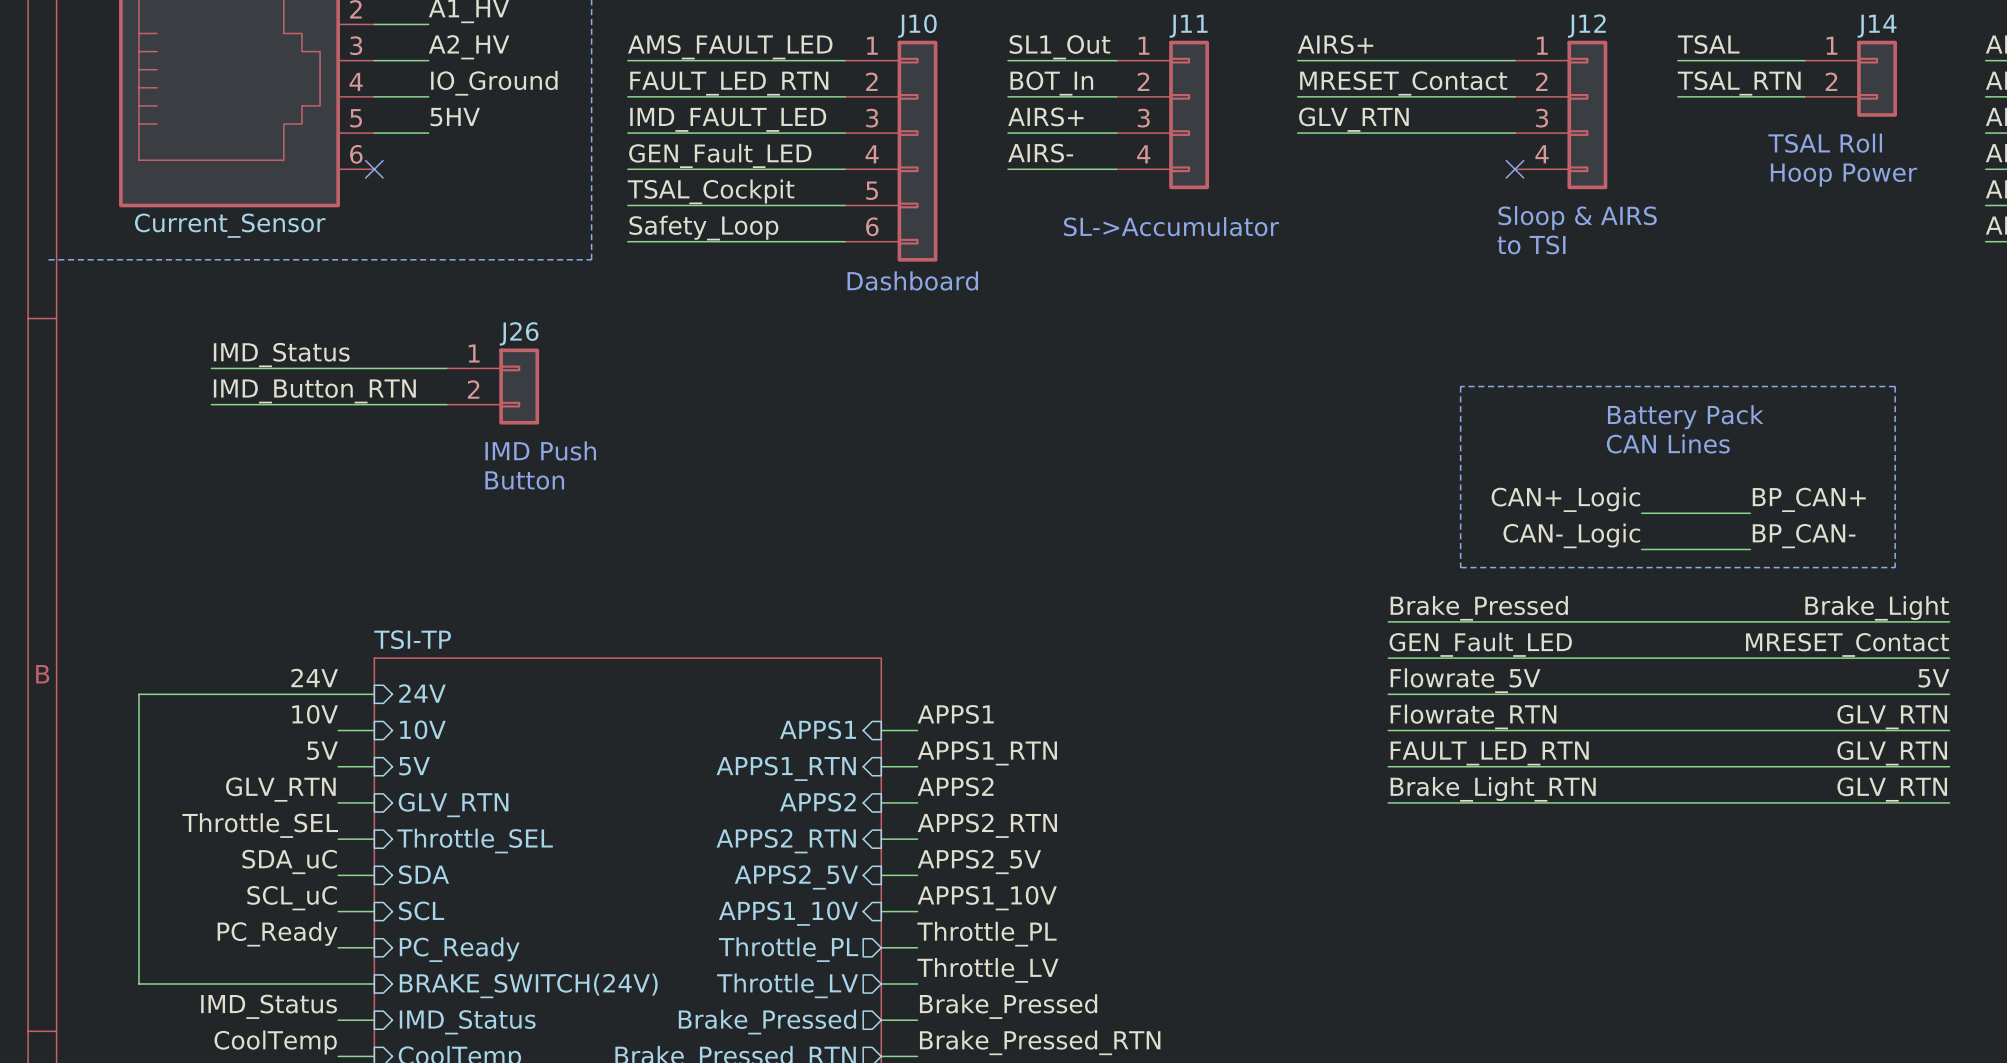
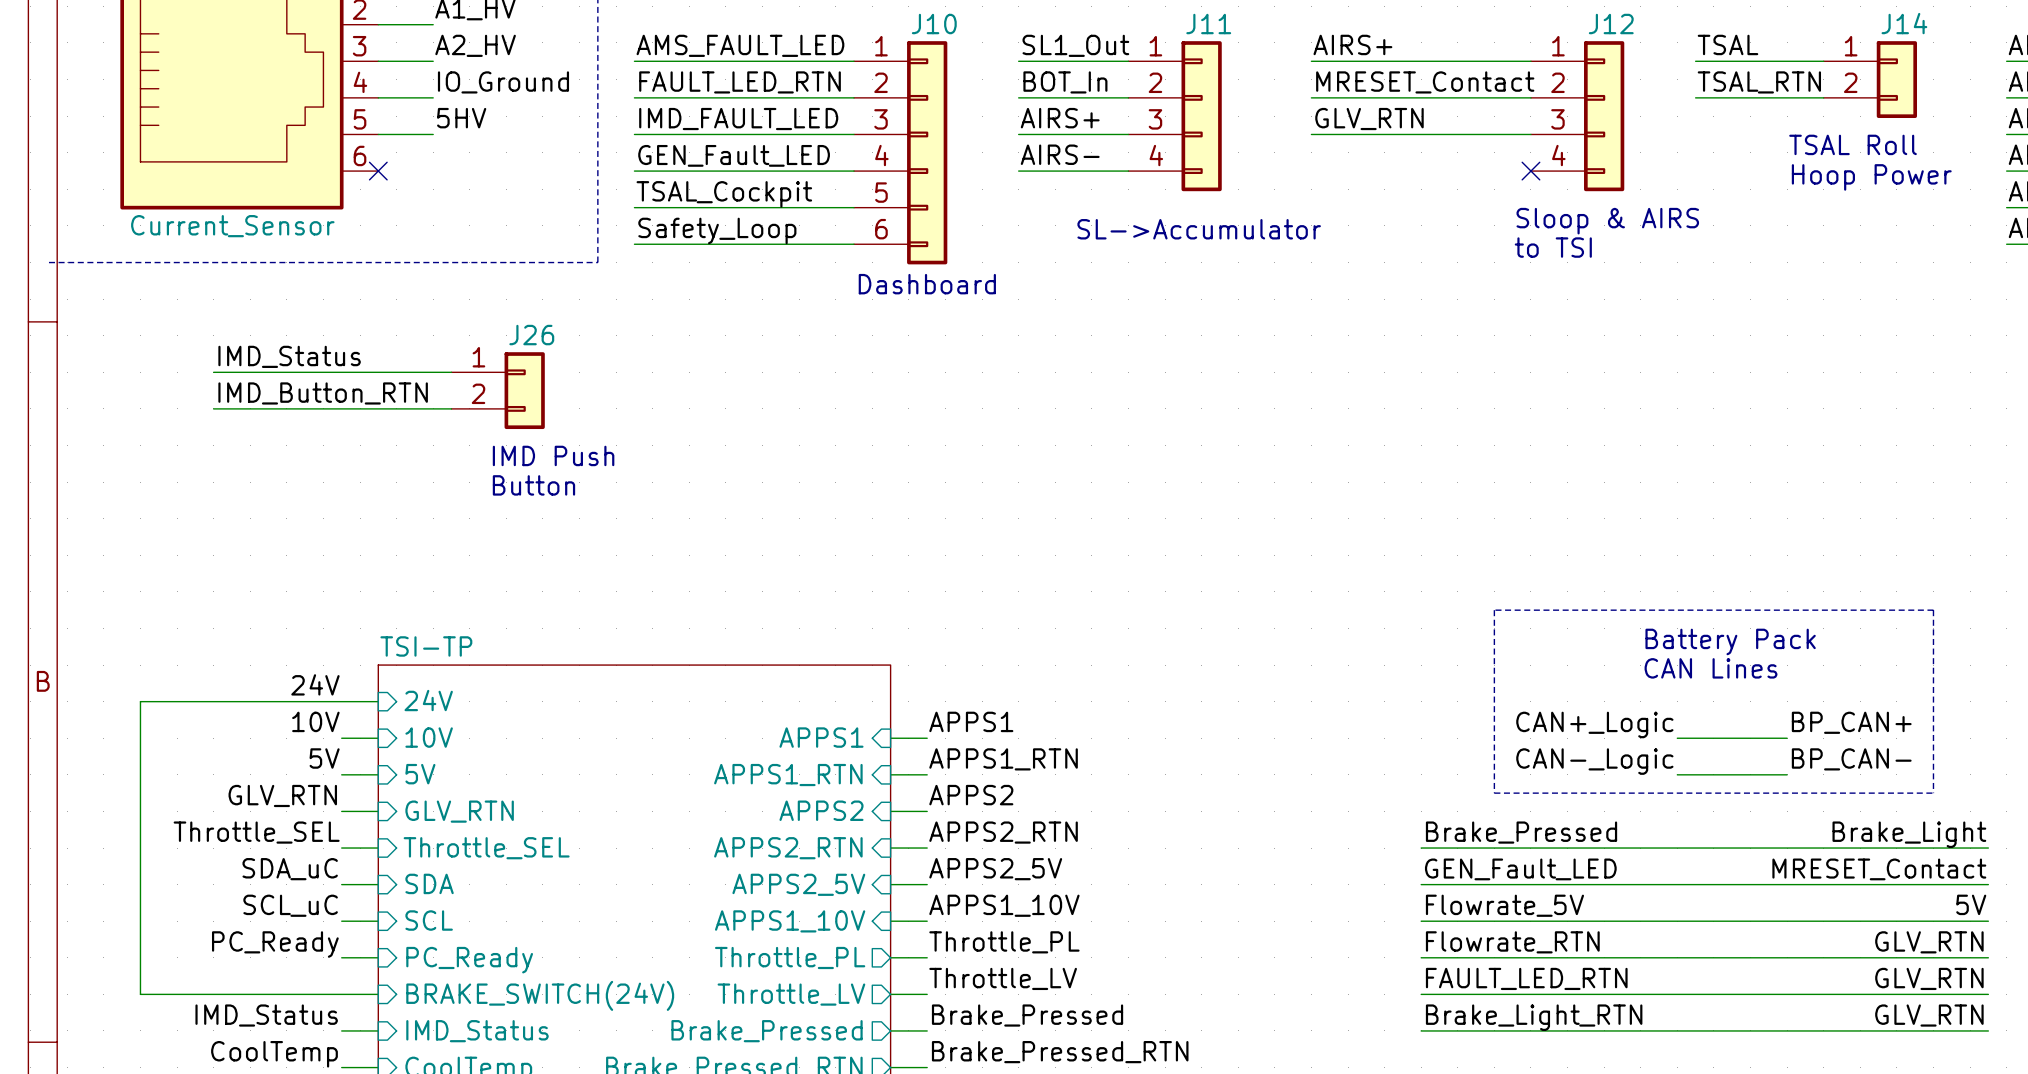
line: (1460, 386) (1895, 386) (1895, 567) (1460, 567) (1460, 386) -> (1494, 610) (1933, 610) (1933, 793) (1494, 793) (1494, 610)
text position: Battery Pack (1685, 417) -> Battery Pack (1730, 641)
text position: CAN Lines (1668, 443) -> CAN Lines (1711, 668)
label position: CAN+_Logic (1565, 499) -> CAN+_Logic (1594, 724)
label position: BP_CAN+ (1809, 499) -> BP_CAN+ (1851, 722)
wire: (1641, 513) (1750, 513) -> none
label position: CAN-_Logic (1571, 535) -> CAN-_Logic (1594, 761)
label position: BP_CAN- (1804, 536) -> BP_CAN- (1851, 759)
wire: (1641, 549) (1750, 549) -> none
label position: Brake_Pressed (1479, 608) -> Brake_Pressed (1521, 832)
label position: Brake_Light (1877, 608) -> Brake_Light (1909, 834)
wire: (1388, 621) (1949, 621) -> (1421, 848) (1988, 848)
label position: GEN_Fault_LED (1480, 644) -> GEN_Fault_LED (1520, 869)
label position: MRESET_Contact (1847, 644) -> MRESET_Contact (1879, 869)
wire: (1388, 658) (1949, 658) -> (1421, 884) (1988, 884)
label position: 5V (1933, 678) -> 5V (1971, 904)
label position: Flowrate_5V (1465, 680) -> Flowrate_5V (1504, 905)
wire: (1388, 694) (1949, 694) -> (1421, 921) (1988, 921)
label position: Flowrate_RTN (1473, 716) -> Flowrate_RTN (1512, 942)
label: GLV_RTN (1892, 717) -> none
wire: (1388, 730) (1659, 730) -> none
wire: (1768, 730) (1949, 730) -> none
label position: FAULT_LED_RTN (1489, 753) -> FAULT_LED_RTN (1526, 978)
label: GLV_RTN (1892, 753) -> none
wire: (1388, 766) (1659, 766) -> none
wire: (1768, 766) (1949, 766) -> none
label position: Brake_Light_RTN (1493, 789) -> Brake_Light_RTN (1534, 1017)
label: GLV_RTN (1892, 789) -> none
wire: (1388, 802) (1949, 802) -> (1421, 1030) (1988, 1030)
label: none -> GLV_RTN (1929, 942)
wire: none -> (1421, 957) (1988, 957)
label: none -> GLV_RTN (1929, 978)
wire: none -> (1421, 994) (1988, 994)
label: none -> GLV_RTN (1929, 1015)

